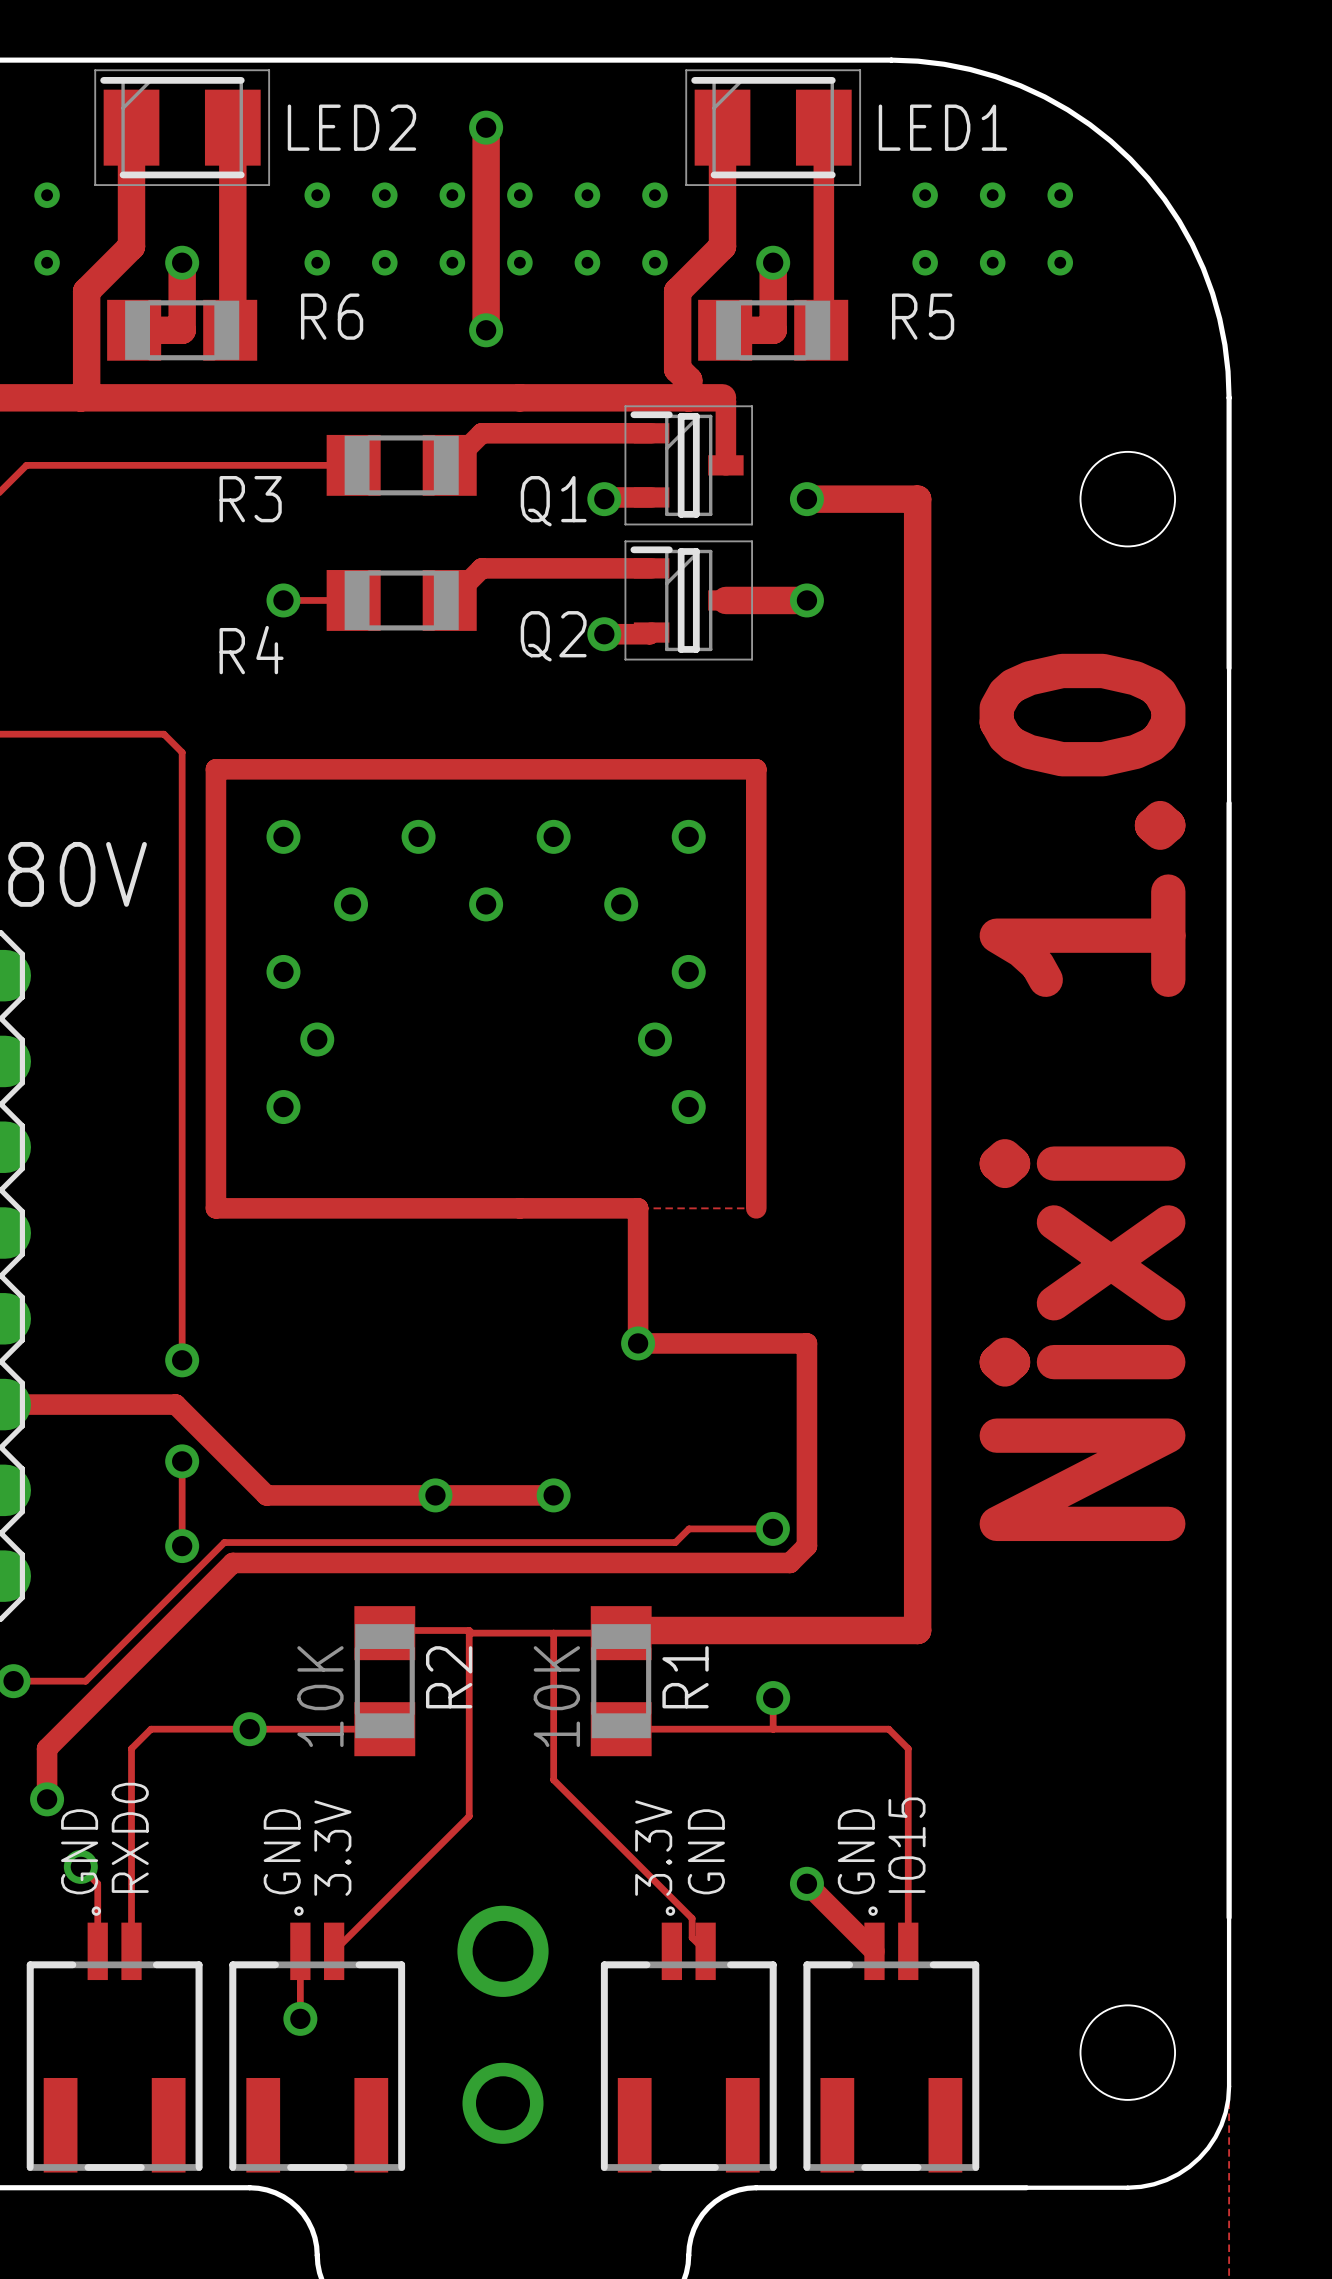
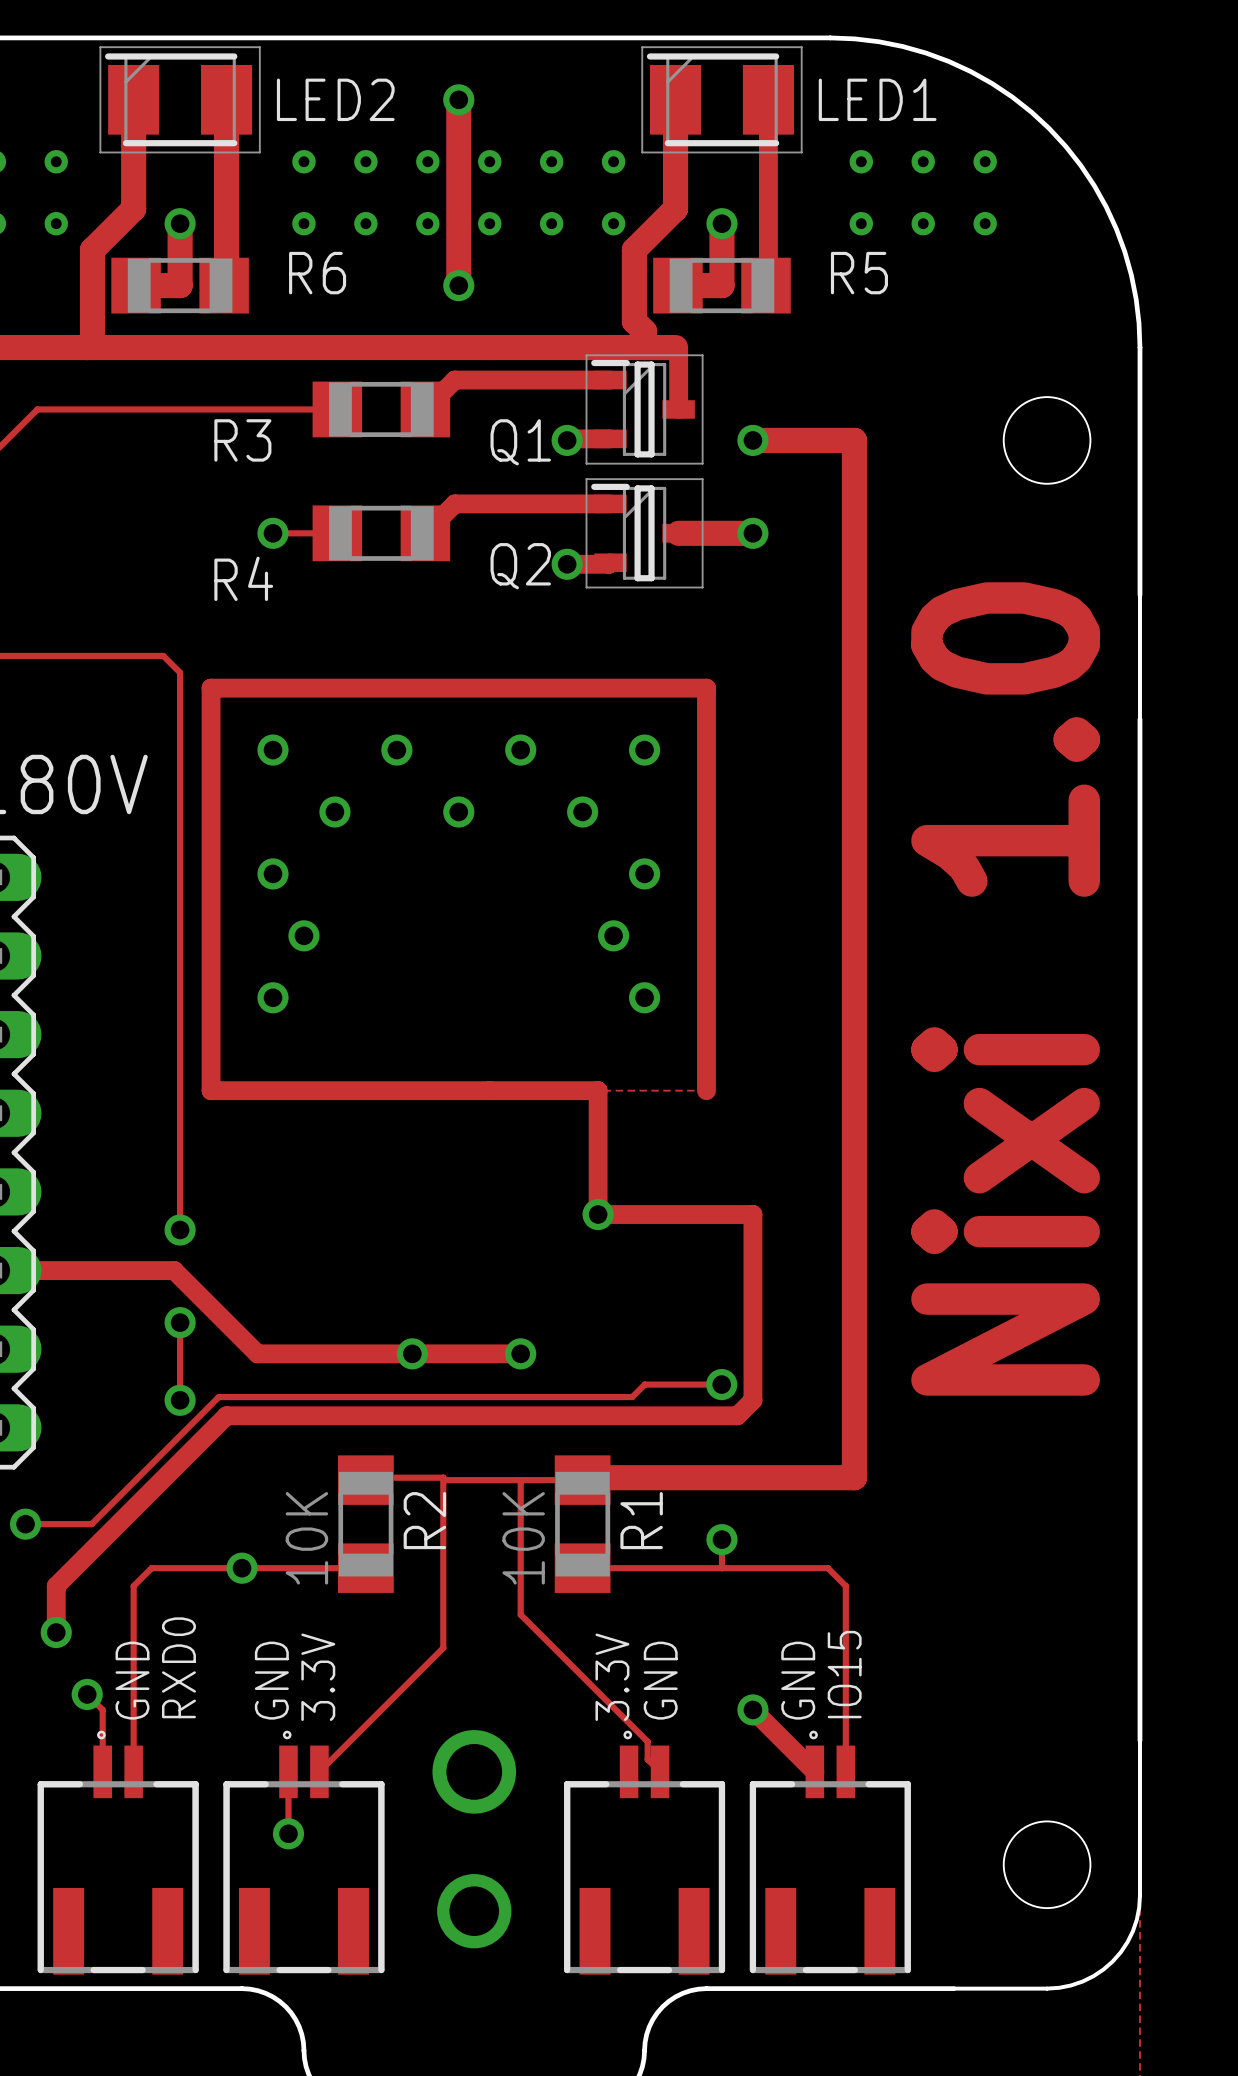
text: RXD0 (130, 1837) -> GND (132, 1680)
text: none -> RXD0 (178, 1667)
text: GND (79, 1851) -> none

